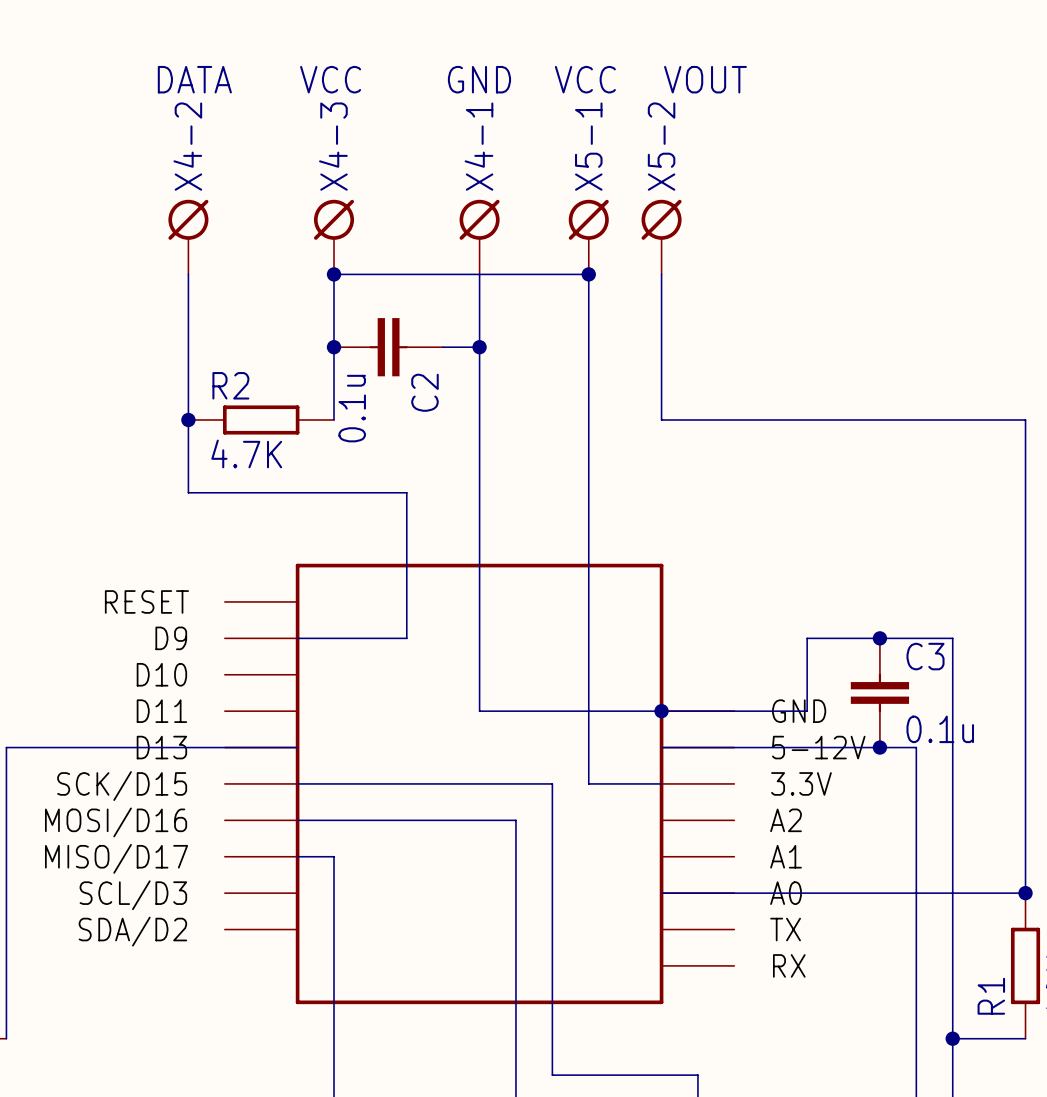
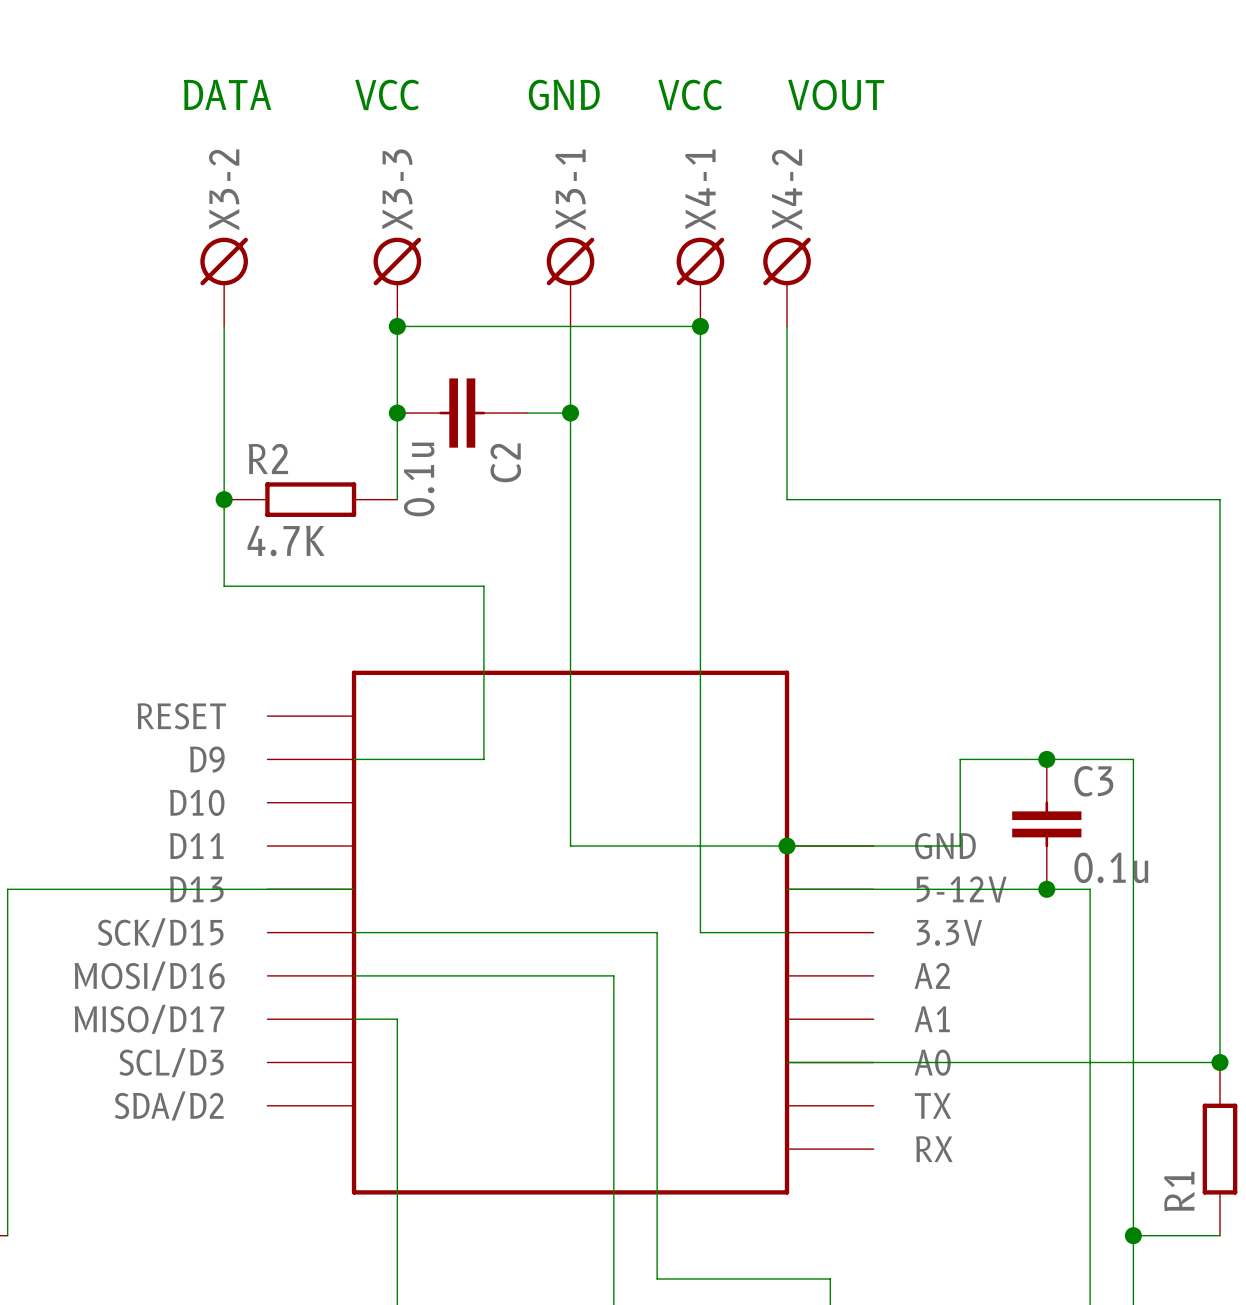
X4-2 name: X4-2 (187, 146) -> X3-2 (224, 189)
X4-3 name: X4-3 (333, 146) -> X3-3 (397, 189)
X4-1 name: X4-1 (478, 146) -> X3-1 (570, 189)
X5-1 name: X5-1 (588, 146) -> X4-1 (700, 189)
X5-2 name: X5-2 (661, 146) -> X4-2 (787, 189)

